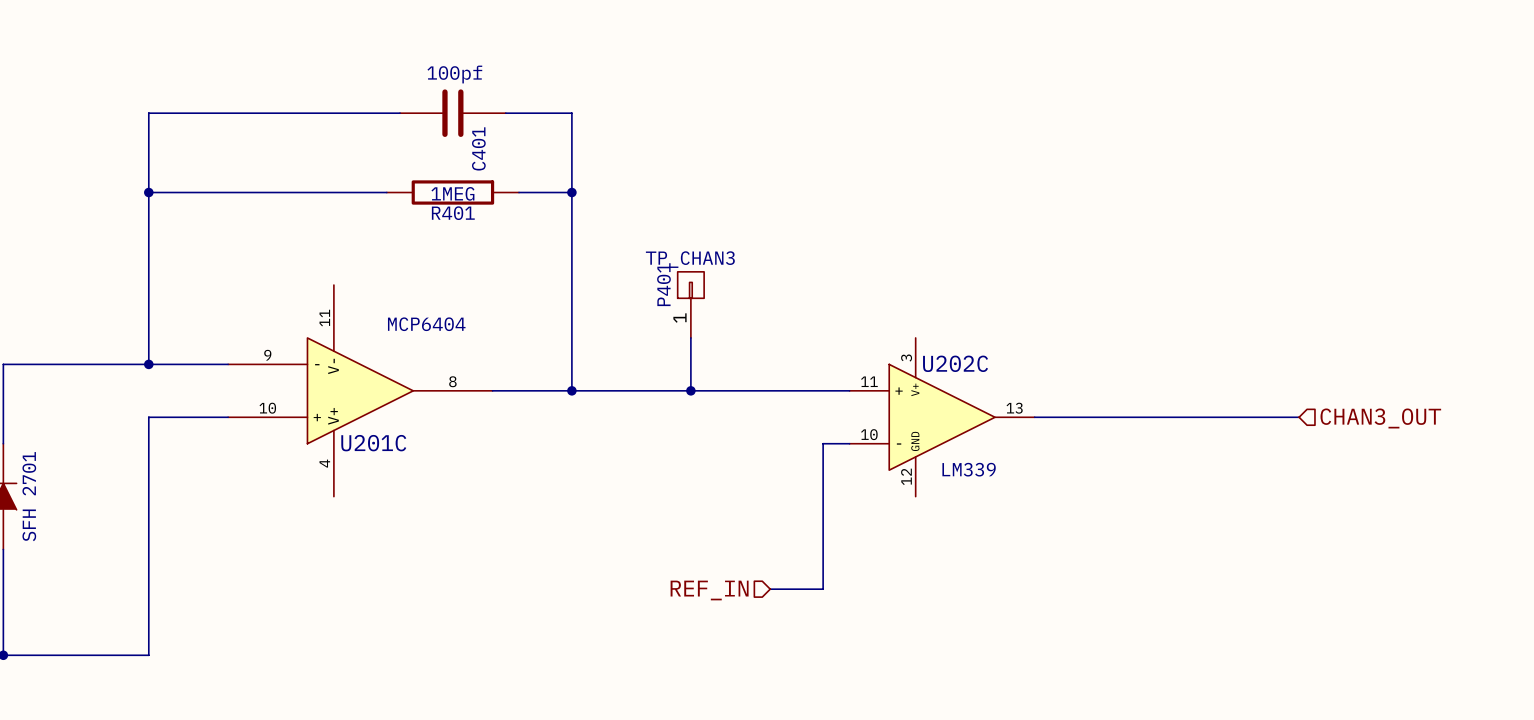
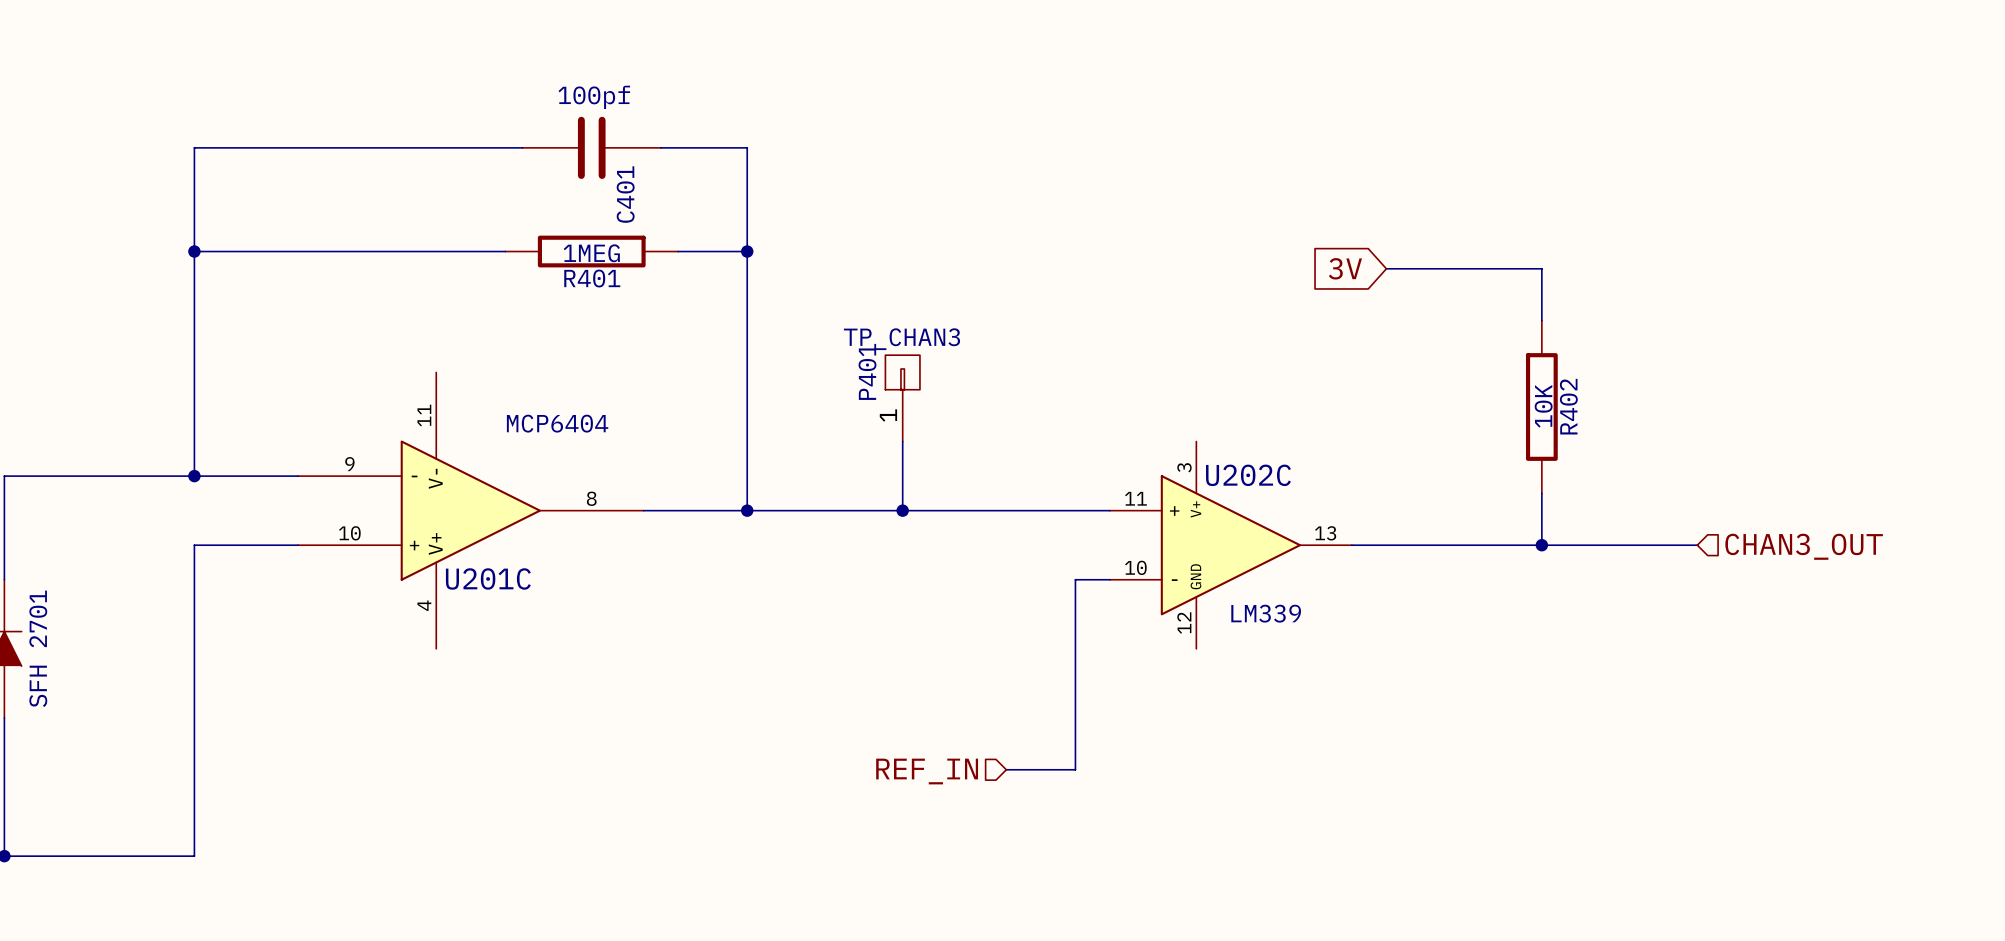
global label: none -> 3V (1345, 268)
wire: none -> (1386, 268) (1541, 268) (1541, 320)
R402: none -> 10K (1541, 407)
wire: none -> (1541, 493) (1541, 545)
junction: none -> (1541, 545)

